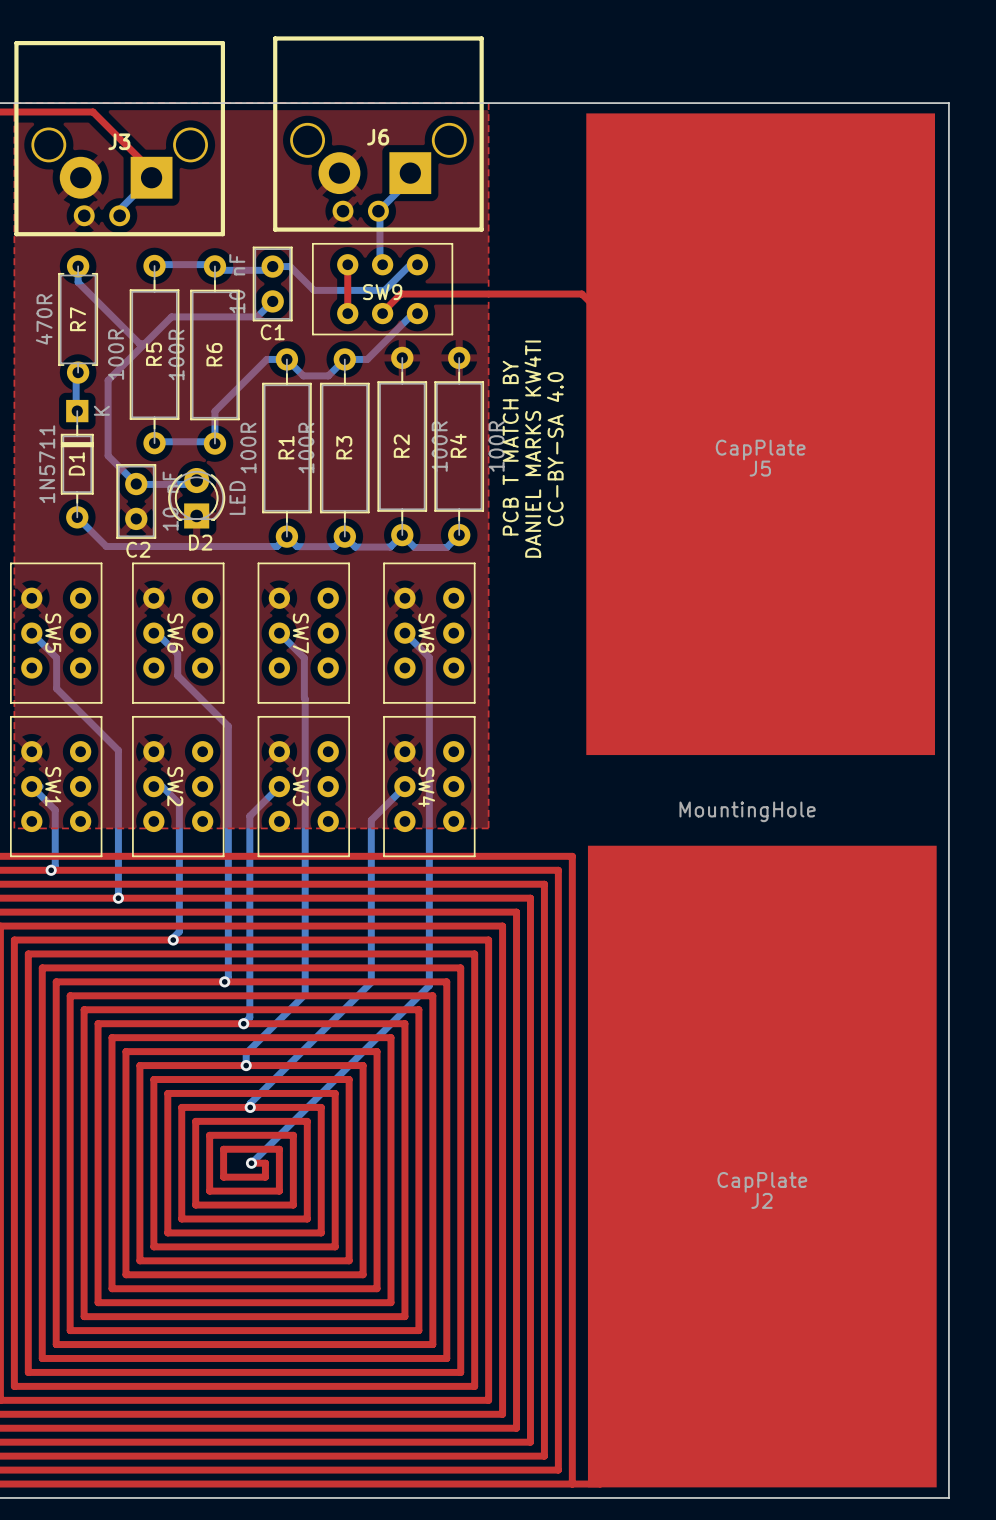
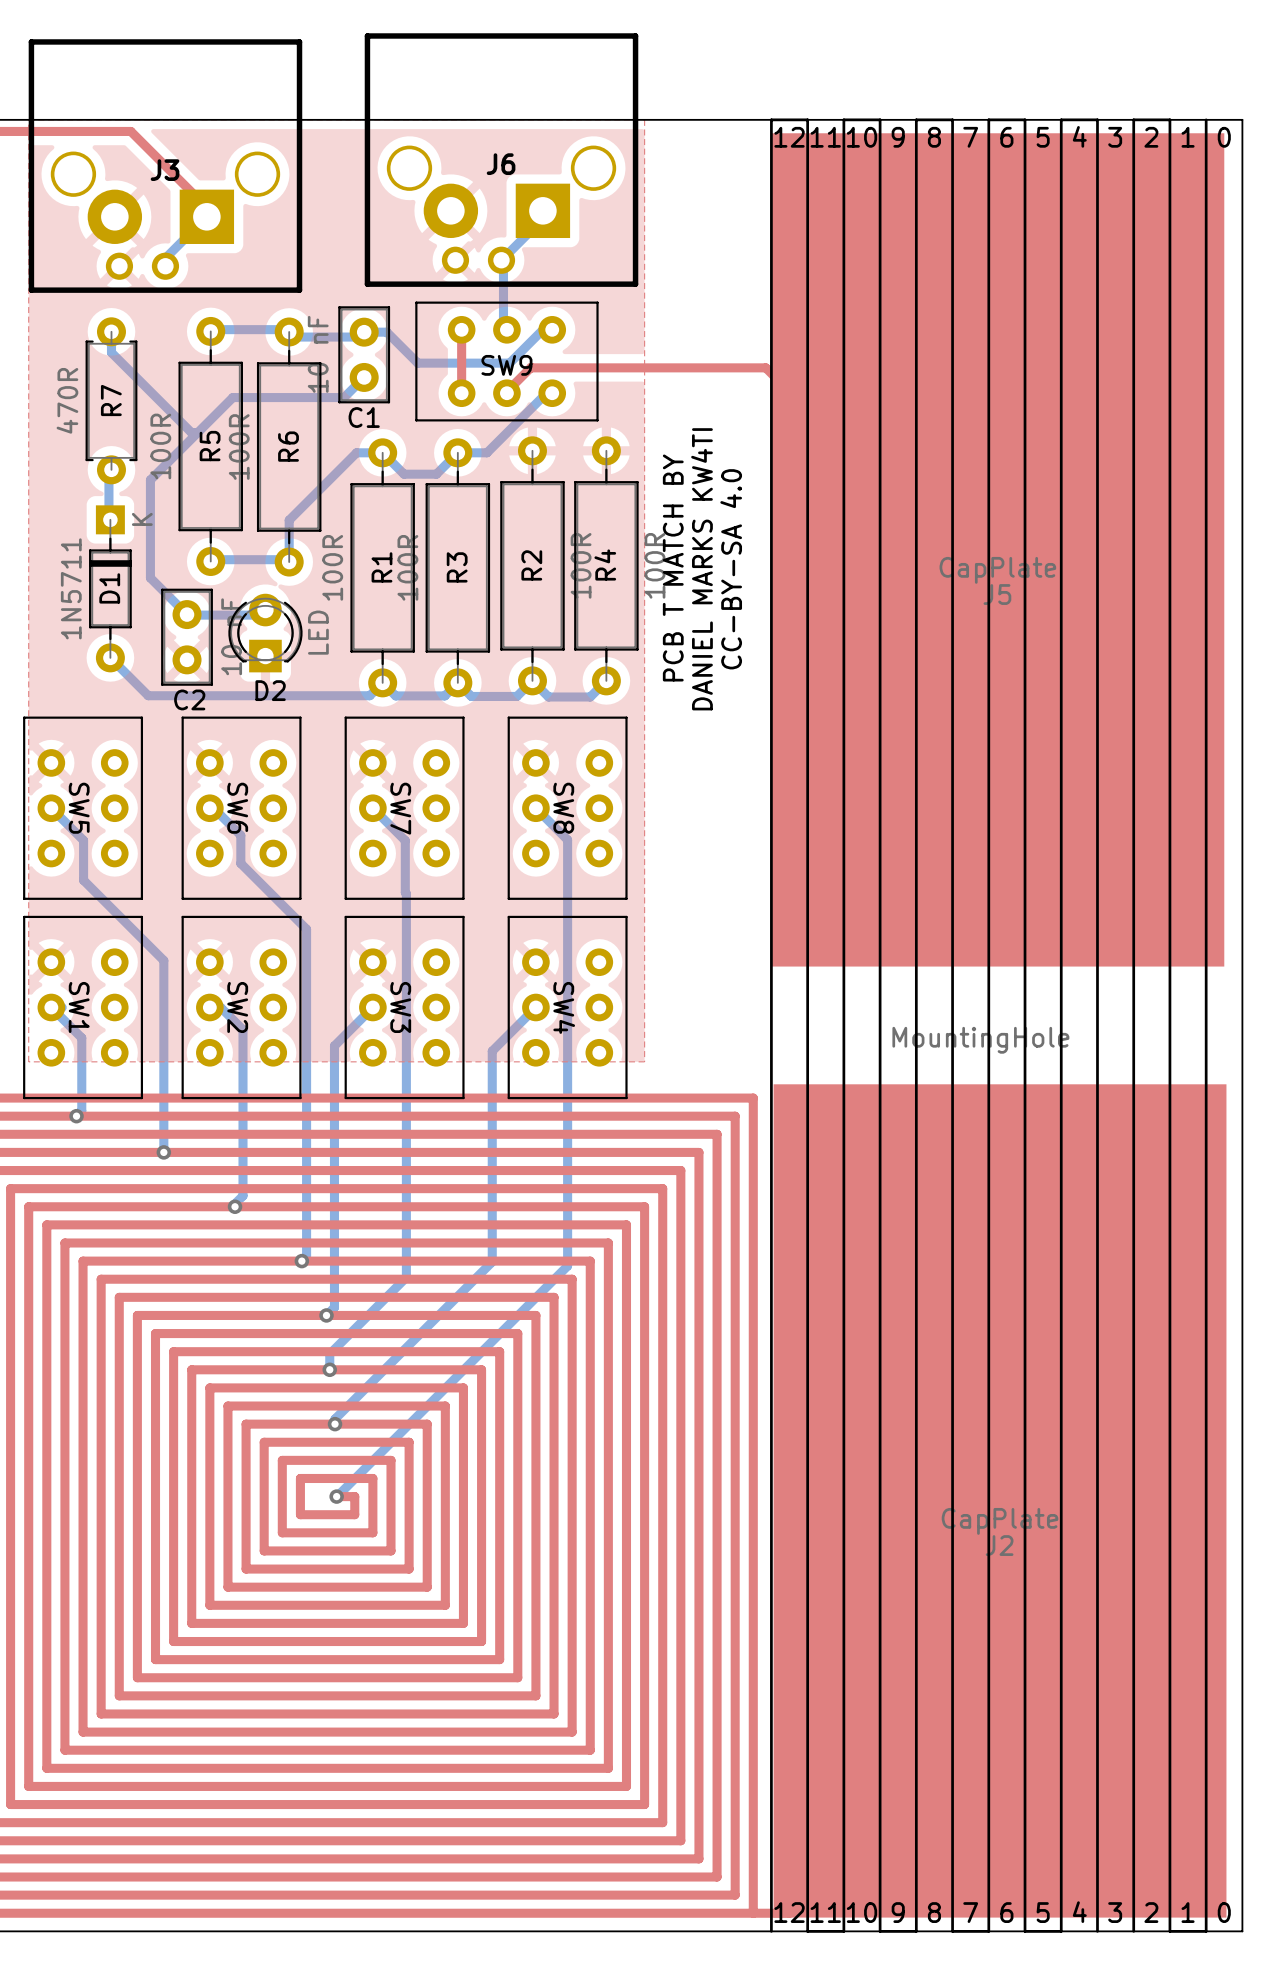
line: none -> (1206, 119) (1206, 1931) (1169, 1931) (1169, 119) (1133, 119) (1133, 1931)
text: none -> 12 (789, 137)
text: none -> 11 (825, 137)
text: none -> 10 (861, 137)
text: none -> 9 (898, 137)
text: none -> 8 (934, 137)
text: none -> 7 (970, 137)
text: none -> 6 (1006, 137)
text: none -> 5 (1043, 137)
text: none -> 4 (1079, 136)
text: none -> 3 (1115, 137)
text: none -> 2 (1151, 137)
text: none -> 1 (1188, 137)
text: none -> 0 (1224, 137)
text: none -> 12 (789, 1912)
text: none -> 11 (825, 1912)
text: none -> 10 (861, 1912)
text: none -> 9 (898, 1912)
text: none -> 8 (934, 1912)
text: none -> 7 (970, 1912)
text: none -> 6 (1006, 1912)
text: none -> 5 (1043, 1912)
text: none -> 4 (1079, 1912)
text: none -> 3 (1115, 1912)
text: none -> 2 (1151, 1912)
text: none -> 1 (1188, 1912)
text: none -> 0 (1224, 1912)
line: none -> (771, 1931) (771, 119) (807, 119) (807, 1931) (843, 1931) (843, 119) (880, 119) (880, 1931) (916, 1931) (916, 119) (952, 119) (952, 1931) (988, 1931) (988, 119) (1025, 119) (1025, 1931) (1061, 1931) (1061, 119) (1097, 119) (1097, 1931)

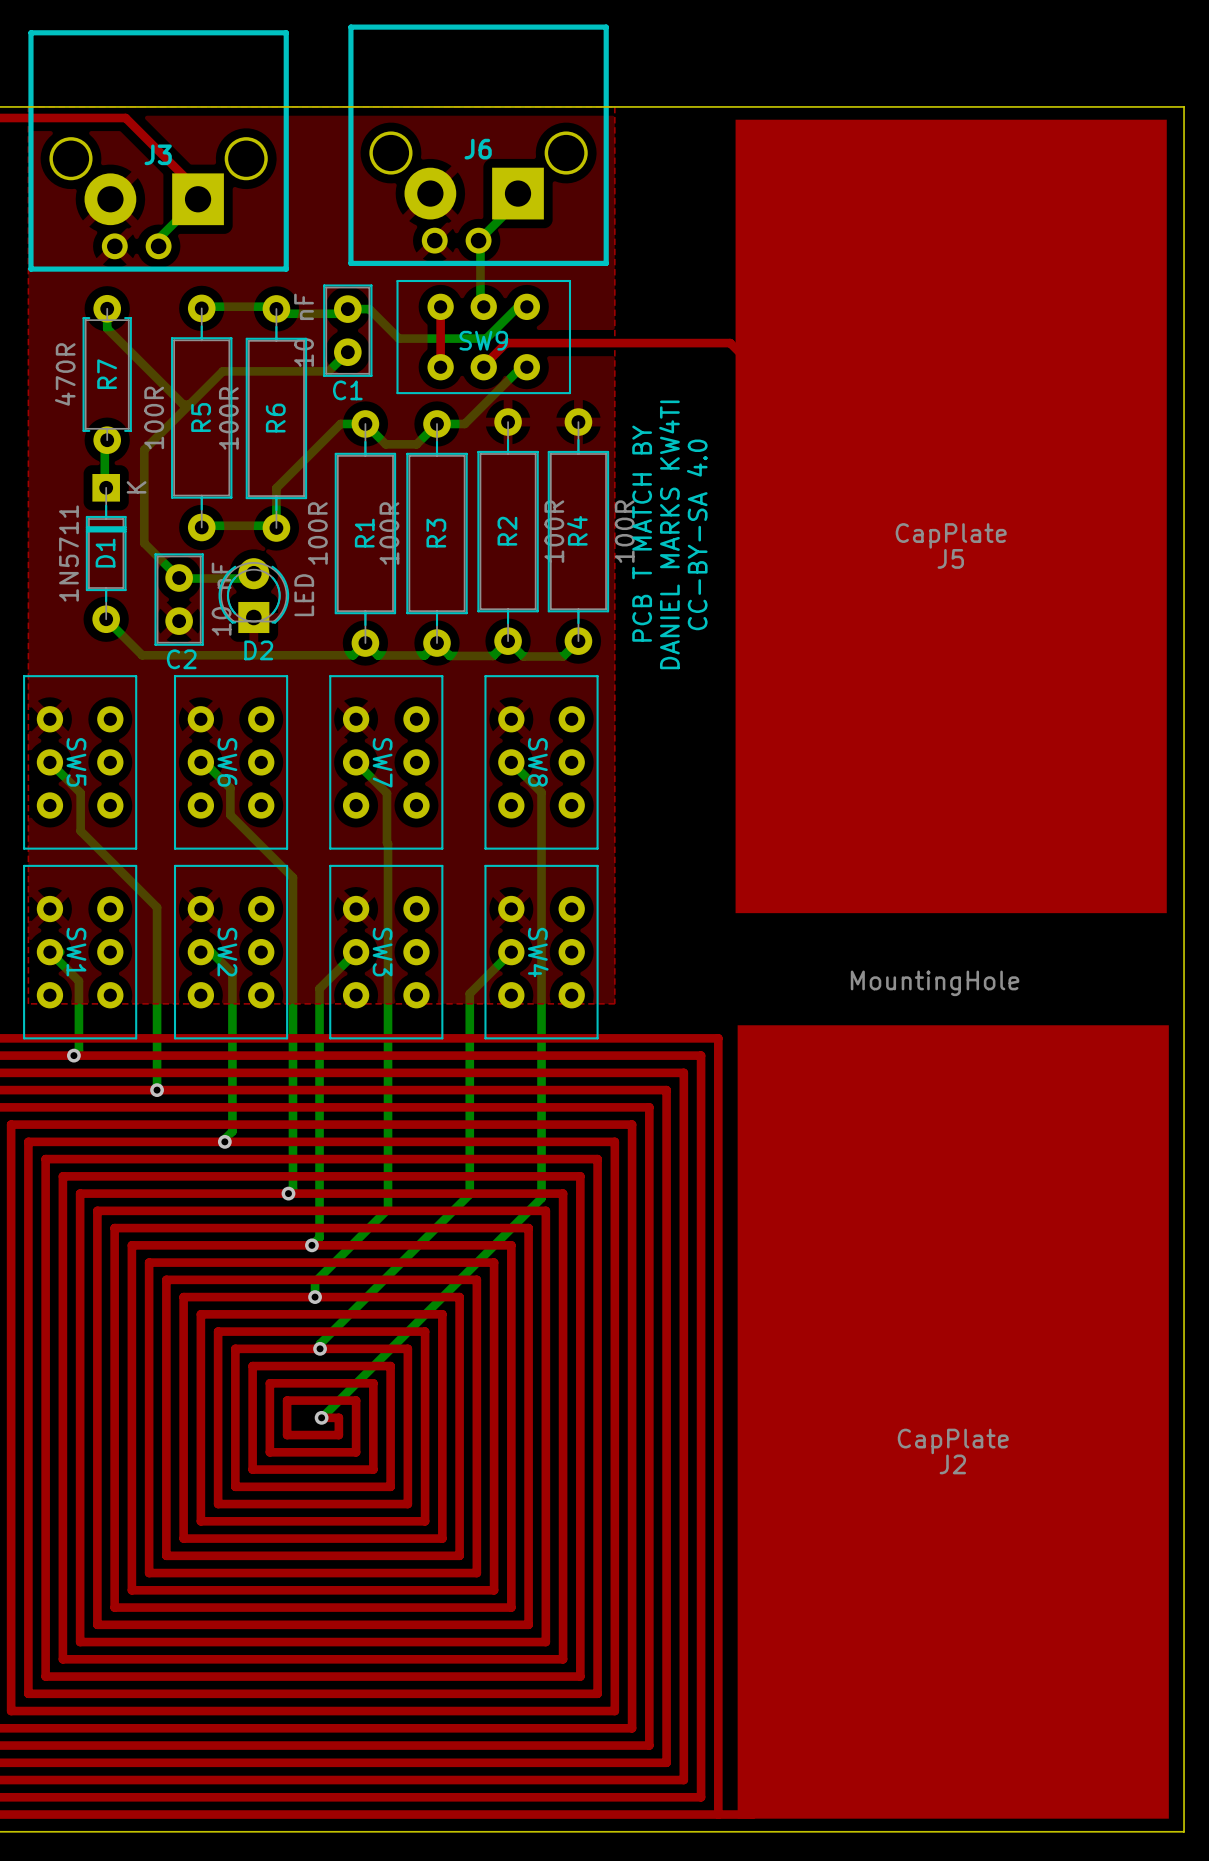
line: (1206, 119) (1206, 1931) (1169, 1931) (1169, 119) (1133, 119) (1133, 1931) -> none
text: 4 (1079, 136) -> none
text: 12 (789, 137) -> none
text: 11 (825, 137) -> none
text: 10 (861, 137) -> none
text: 9 (898, 137) -> none
text: 8 (934, 137) -> none
text: 7 (970, 137) -> none
text: 6 (1006, 137) -> none
text: 5 (1043, 137) -> none
text: 3 (1115, 137) -> none
text: 2 (1151, 137) -> none
text: 1 (1188, 137) -> none
text: 0 (1224, 137) -> none
text: 12 (789, 1912) -> none
text: 11 (825, 1912) -> none
text: 10 (861, 1912) -> none
text: 9 (898, 1912) -> none
text: 8 (934, 1912) -> none
text: 7 (970, 1912) -> none
text: 6 (1006, 1912) -> none
text: 5 (1043, 1912) -> none
text: 4 (1079, 1912) -> none
text: 3 (1115, 1912) -> none
text: 2 (1151, 1912) -> none
text: 1 (1188, 1912) -> none
text: 0 (1224, 1912) -> none
line: (771, 1931) (771, 119) (807, 119) (807, 1931) (843, 1931) (843, 119) (880, 119) (880, 1931) (916, 1931) (916, 119) (952, 119) (952, 1931) (988, 1931) (988, 119) (1025, 119) (1025, 1931) (1061, 1931) (1061, 119) (1097, 119) (1097, 1931) -> none

